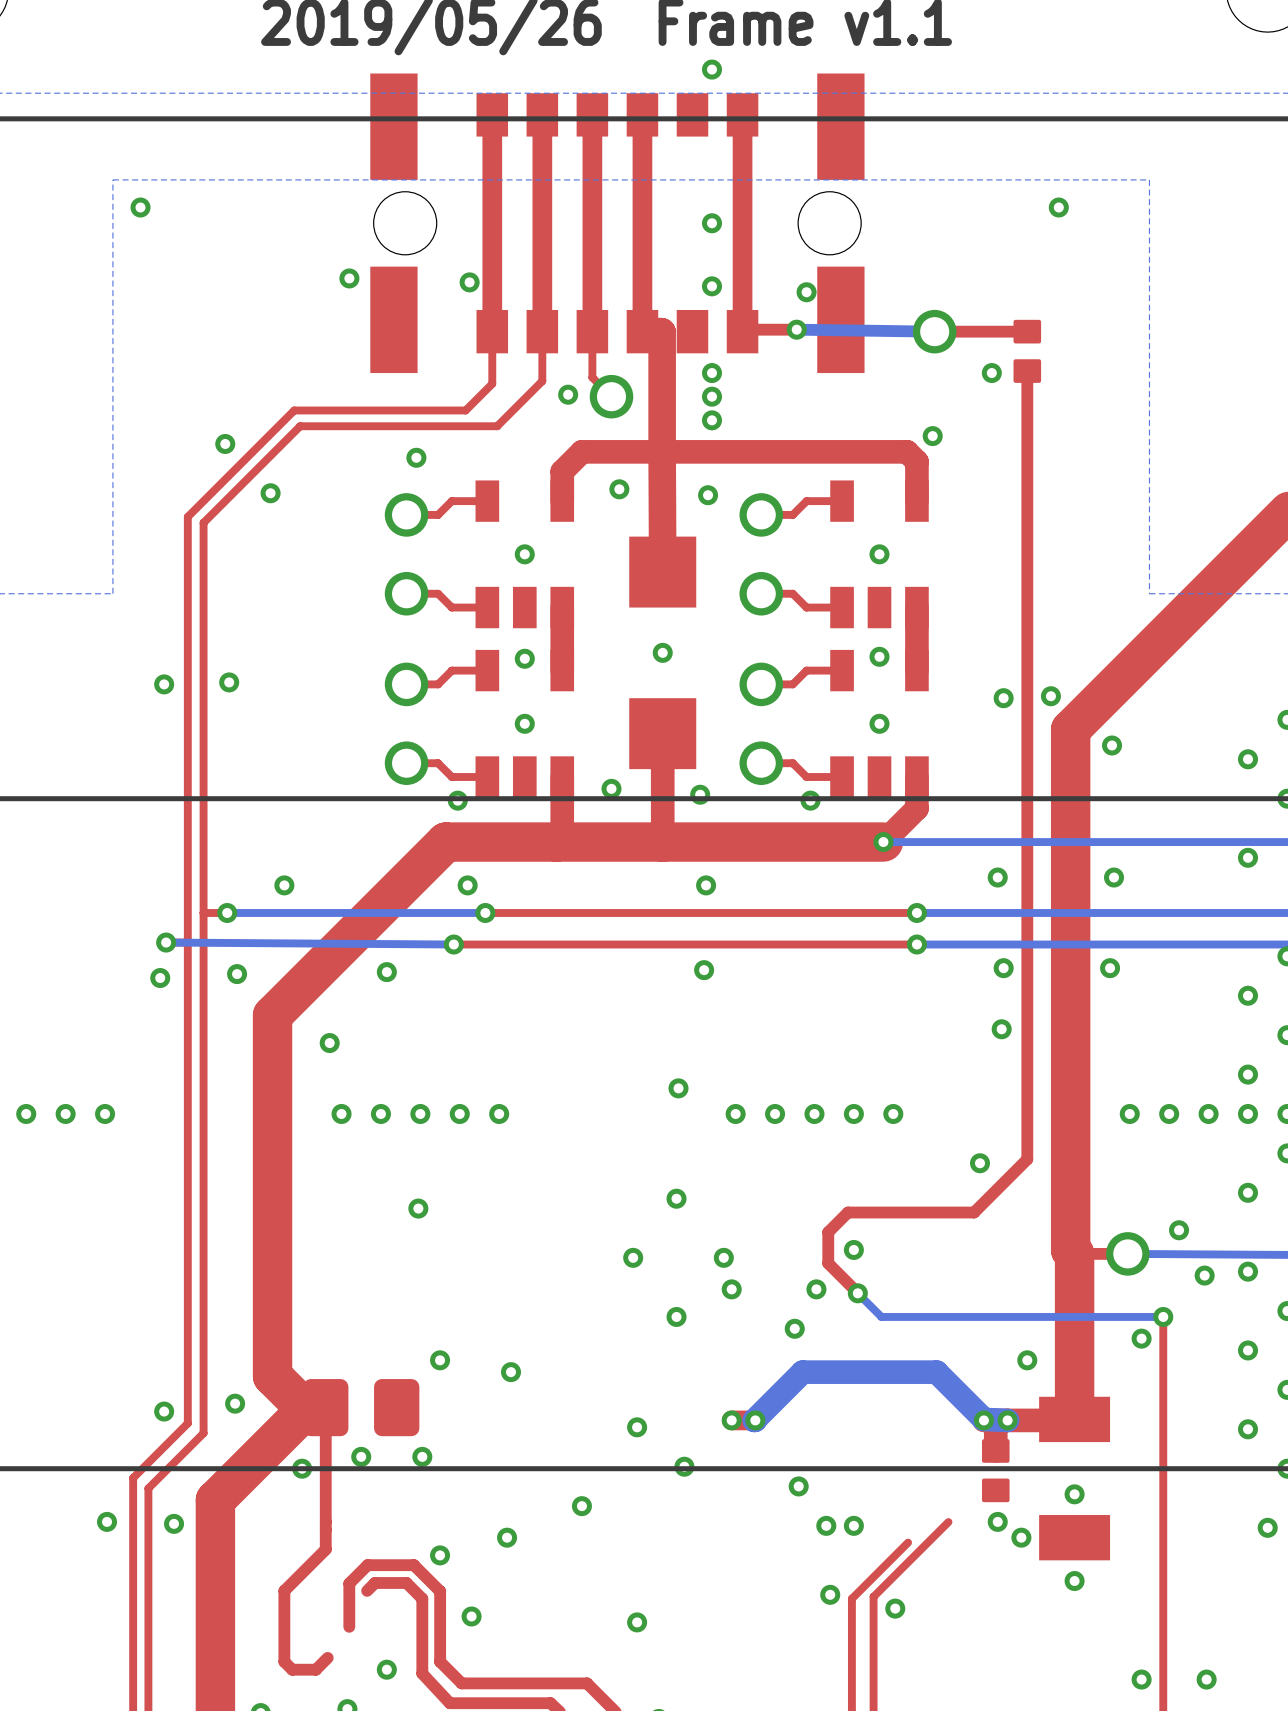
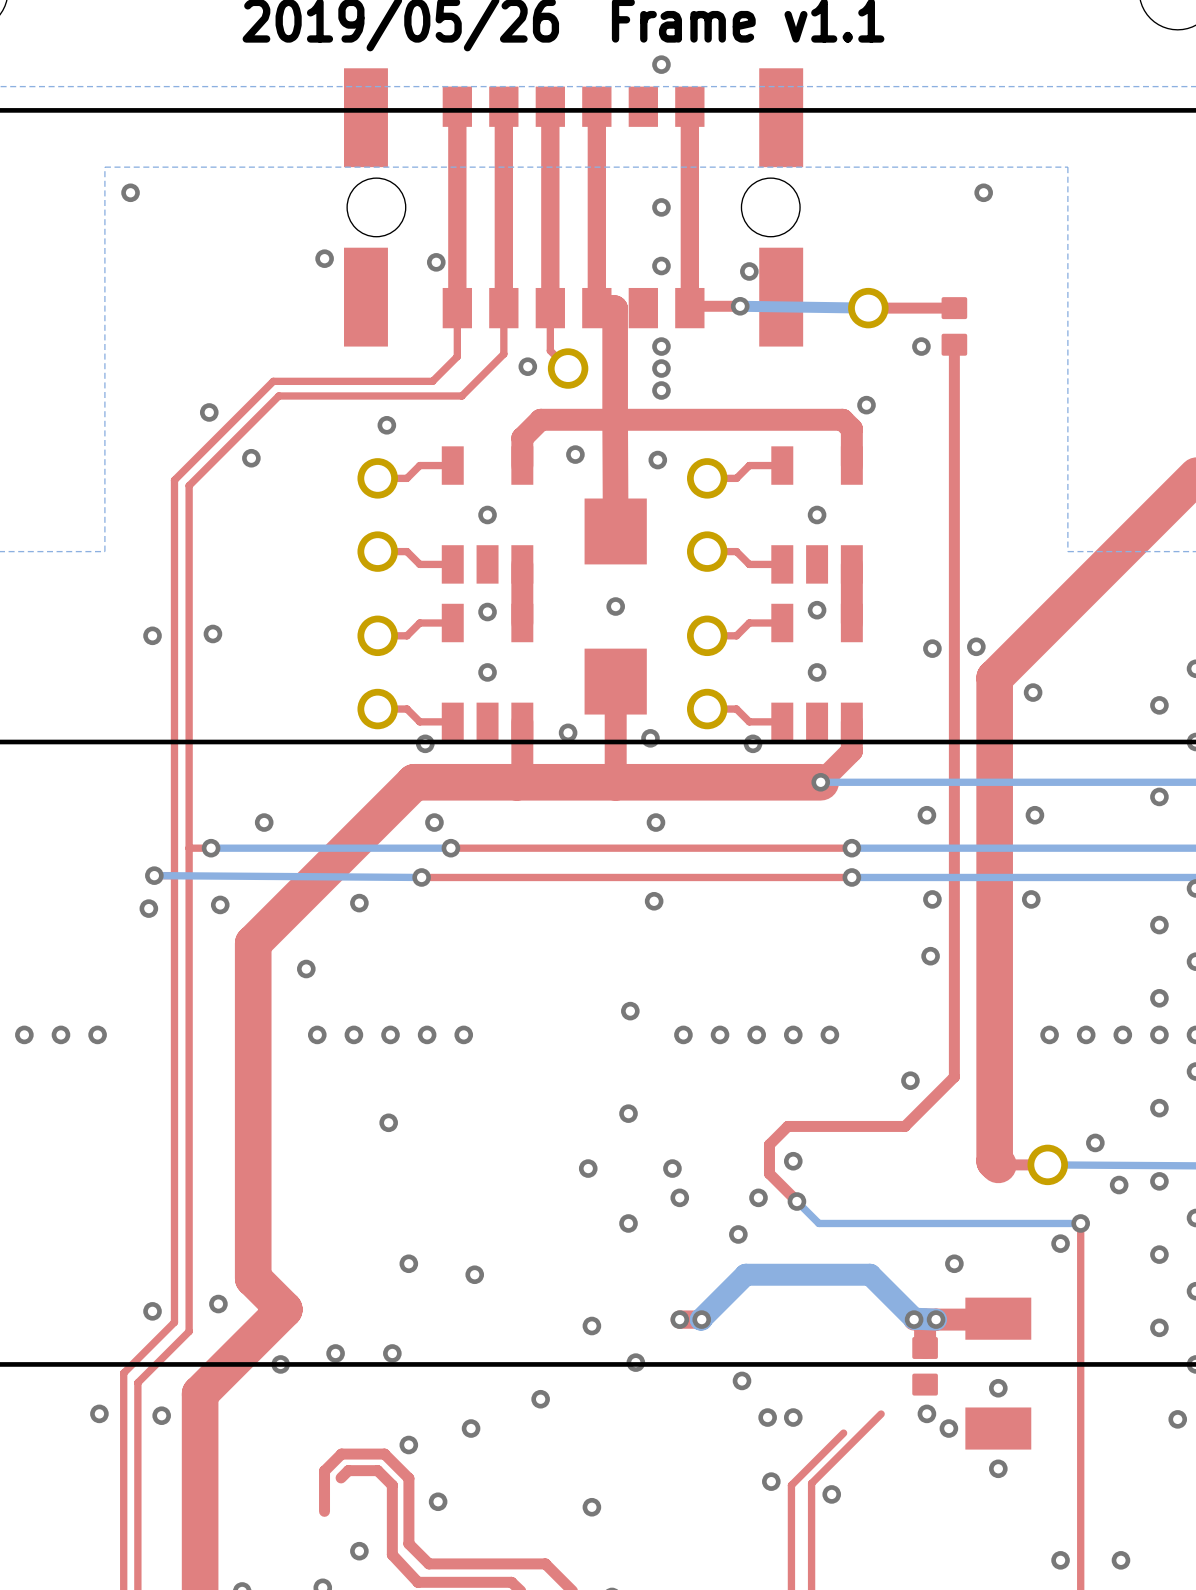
top track: (1074, 1253) (1074, 1419) -> none
part: (361, 1407) -> none
top track: (306, 1409) (325, 1407) (325, 1549) (284, 1590) (284, 1661) (292, 1669) (315, 1669) (327, 1657) -> none

